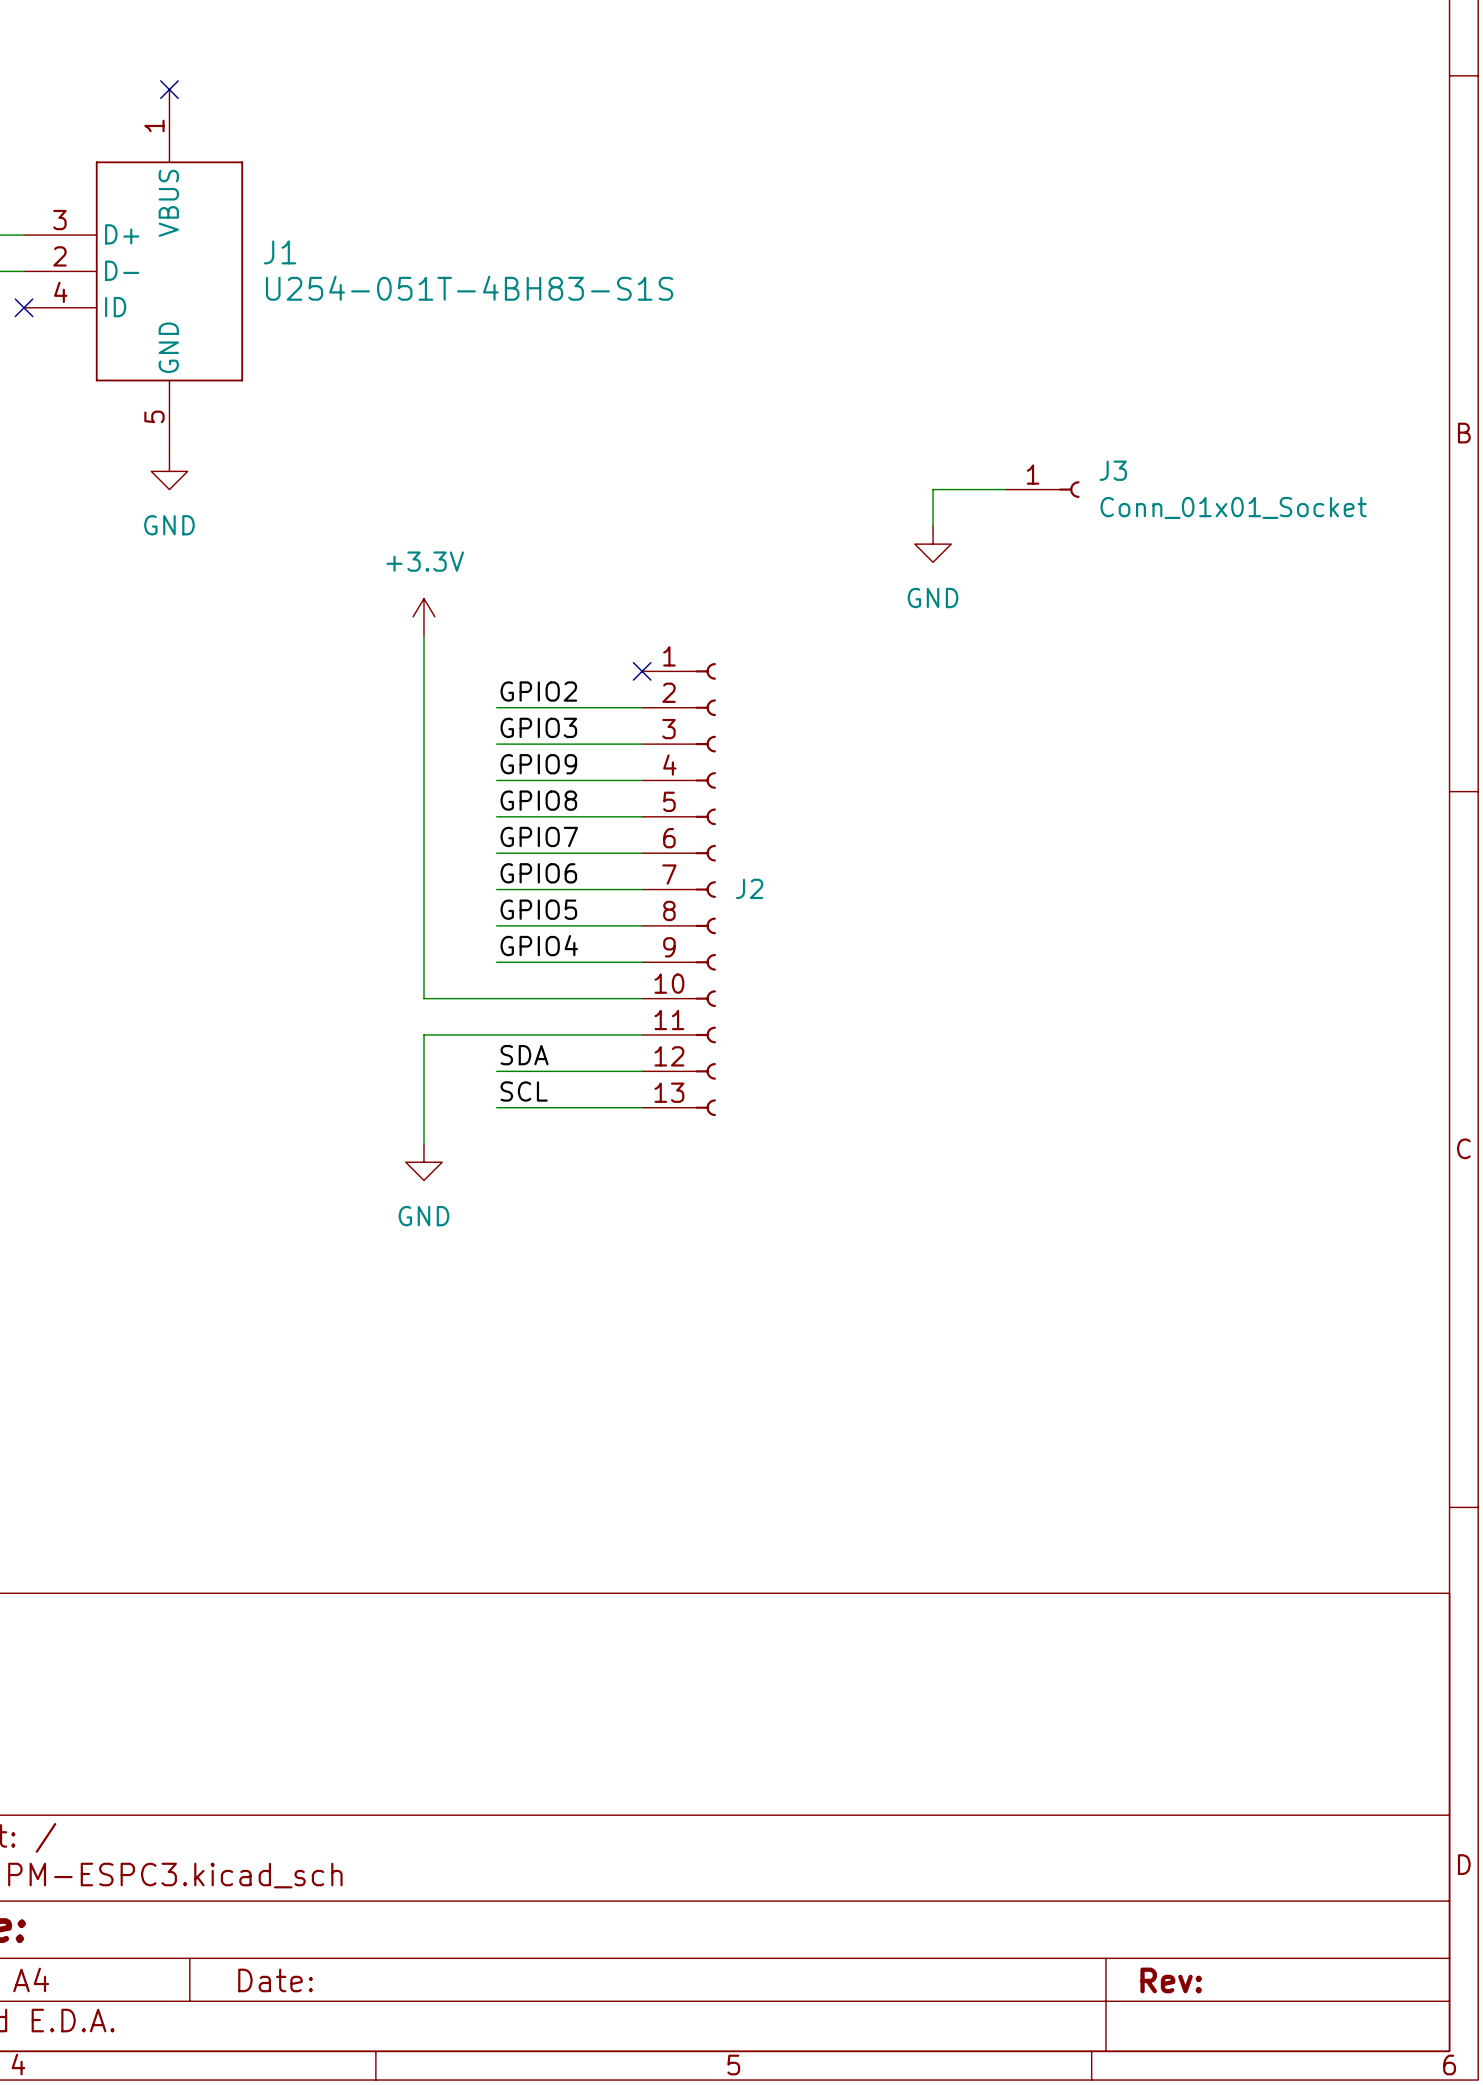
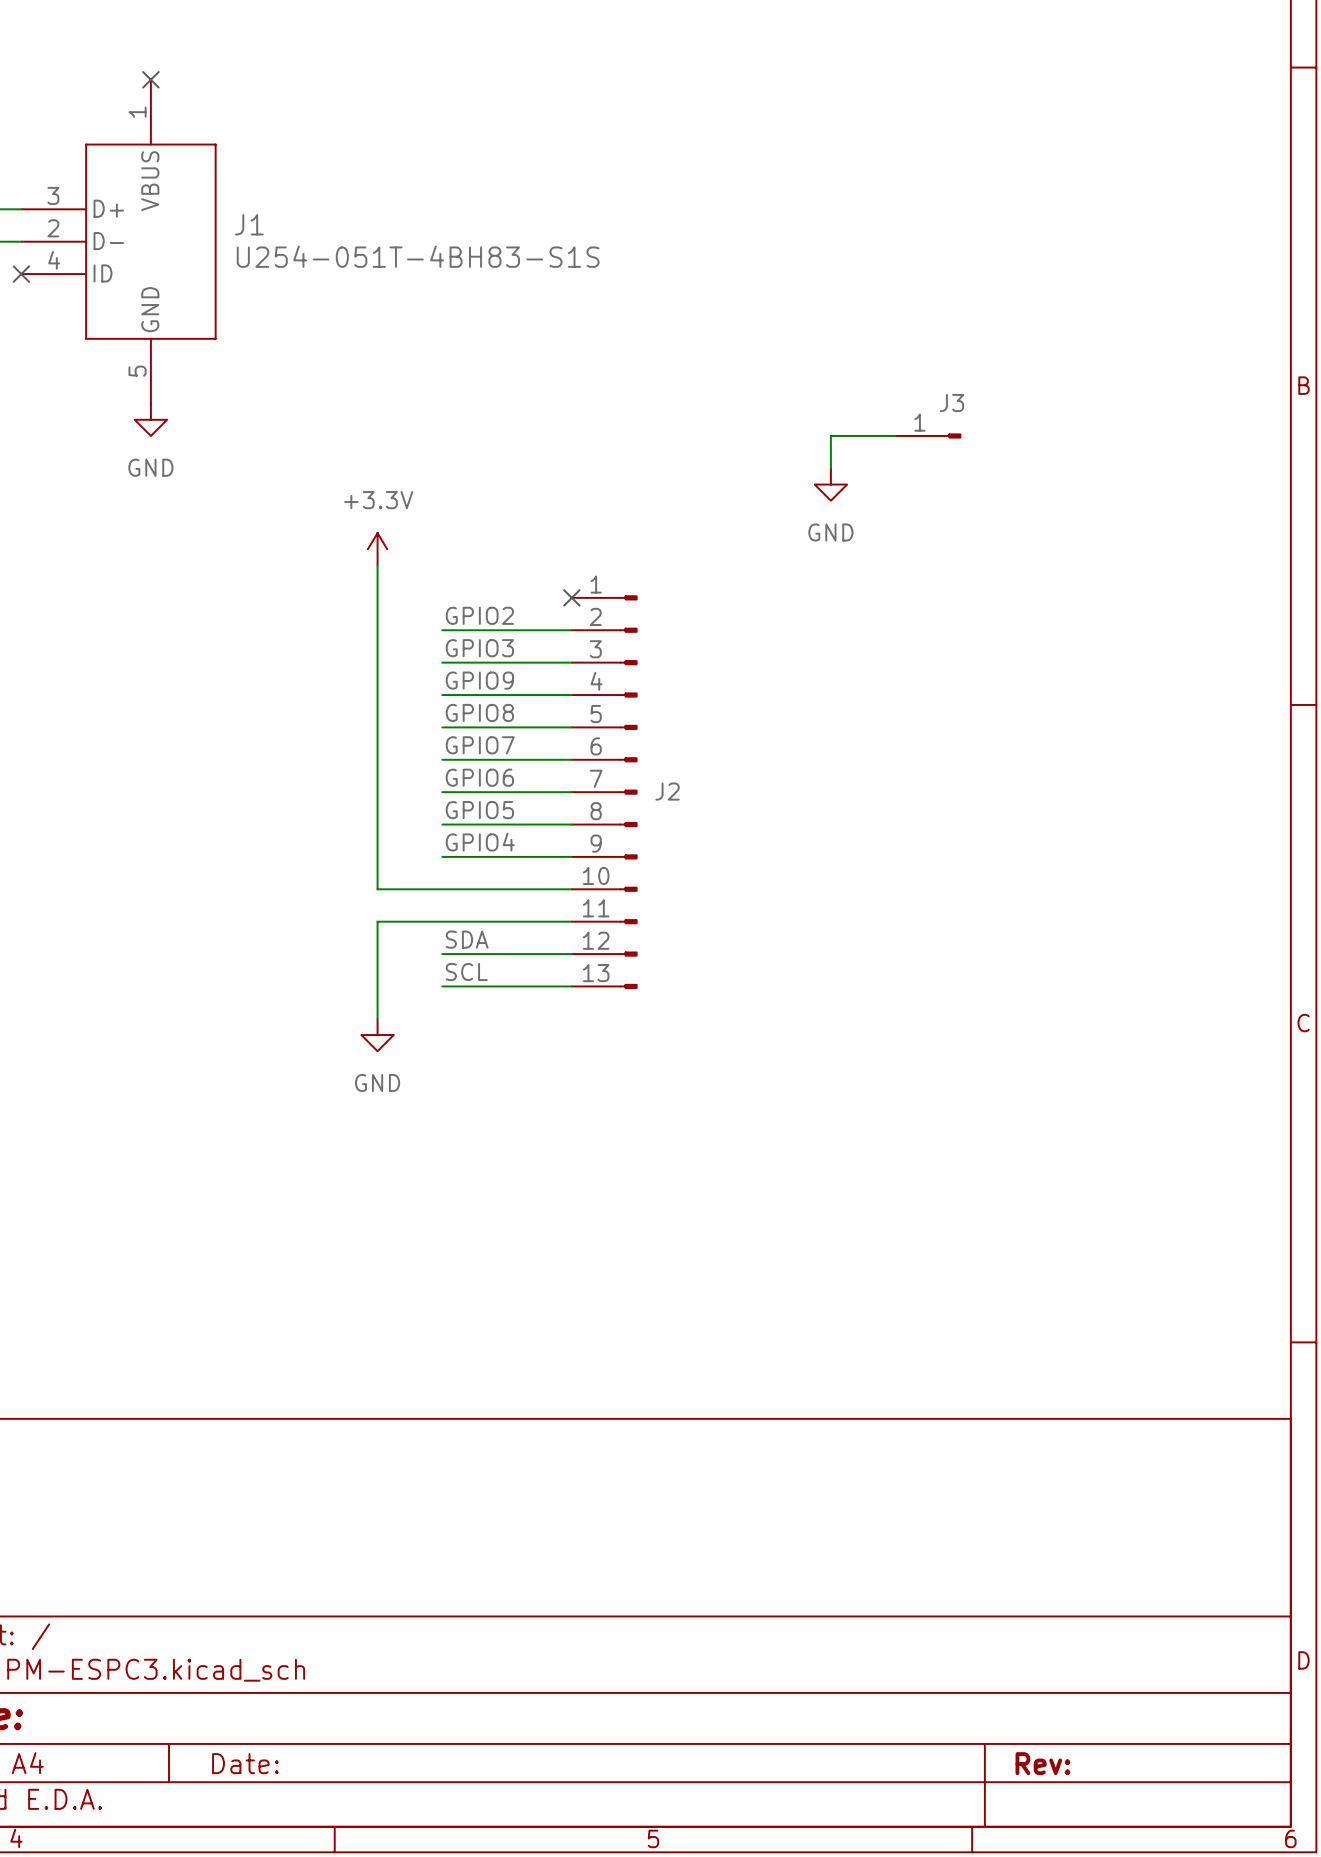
J3 name position: J3 (1113, 470) -> J3 (951, 402)
J3 symbol: [1005, 481, 1080, 498] -> [895, 433, 962, 439]
J3 value: Conn_01x01_Socket (1233, 507) -> none
J2 symbol: [642, 663, 716, 1117] -> [571, 595, 638, 990]

